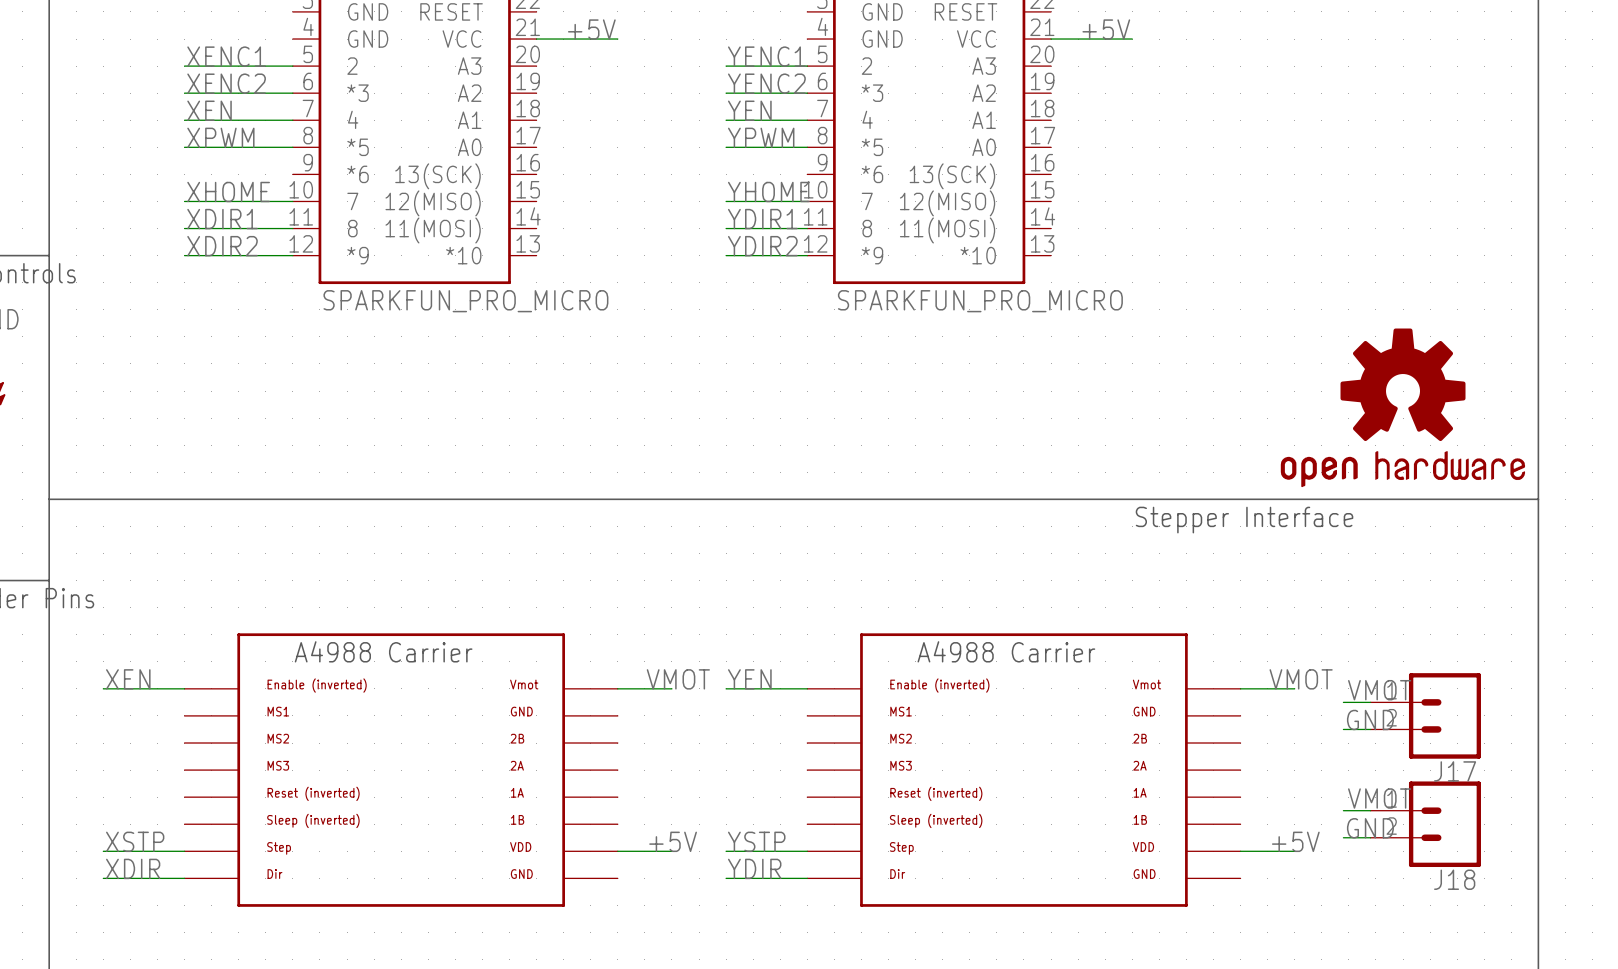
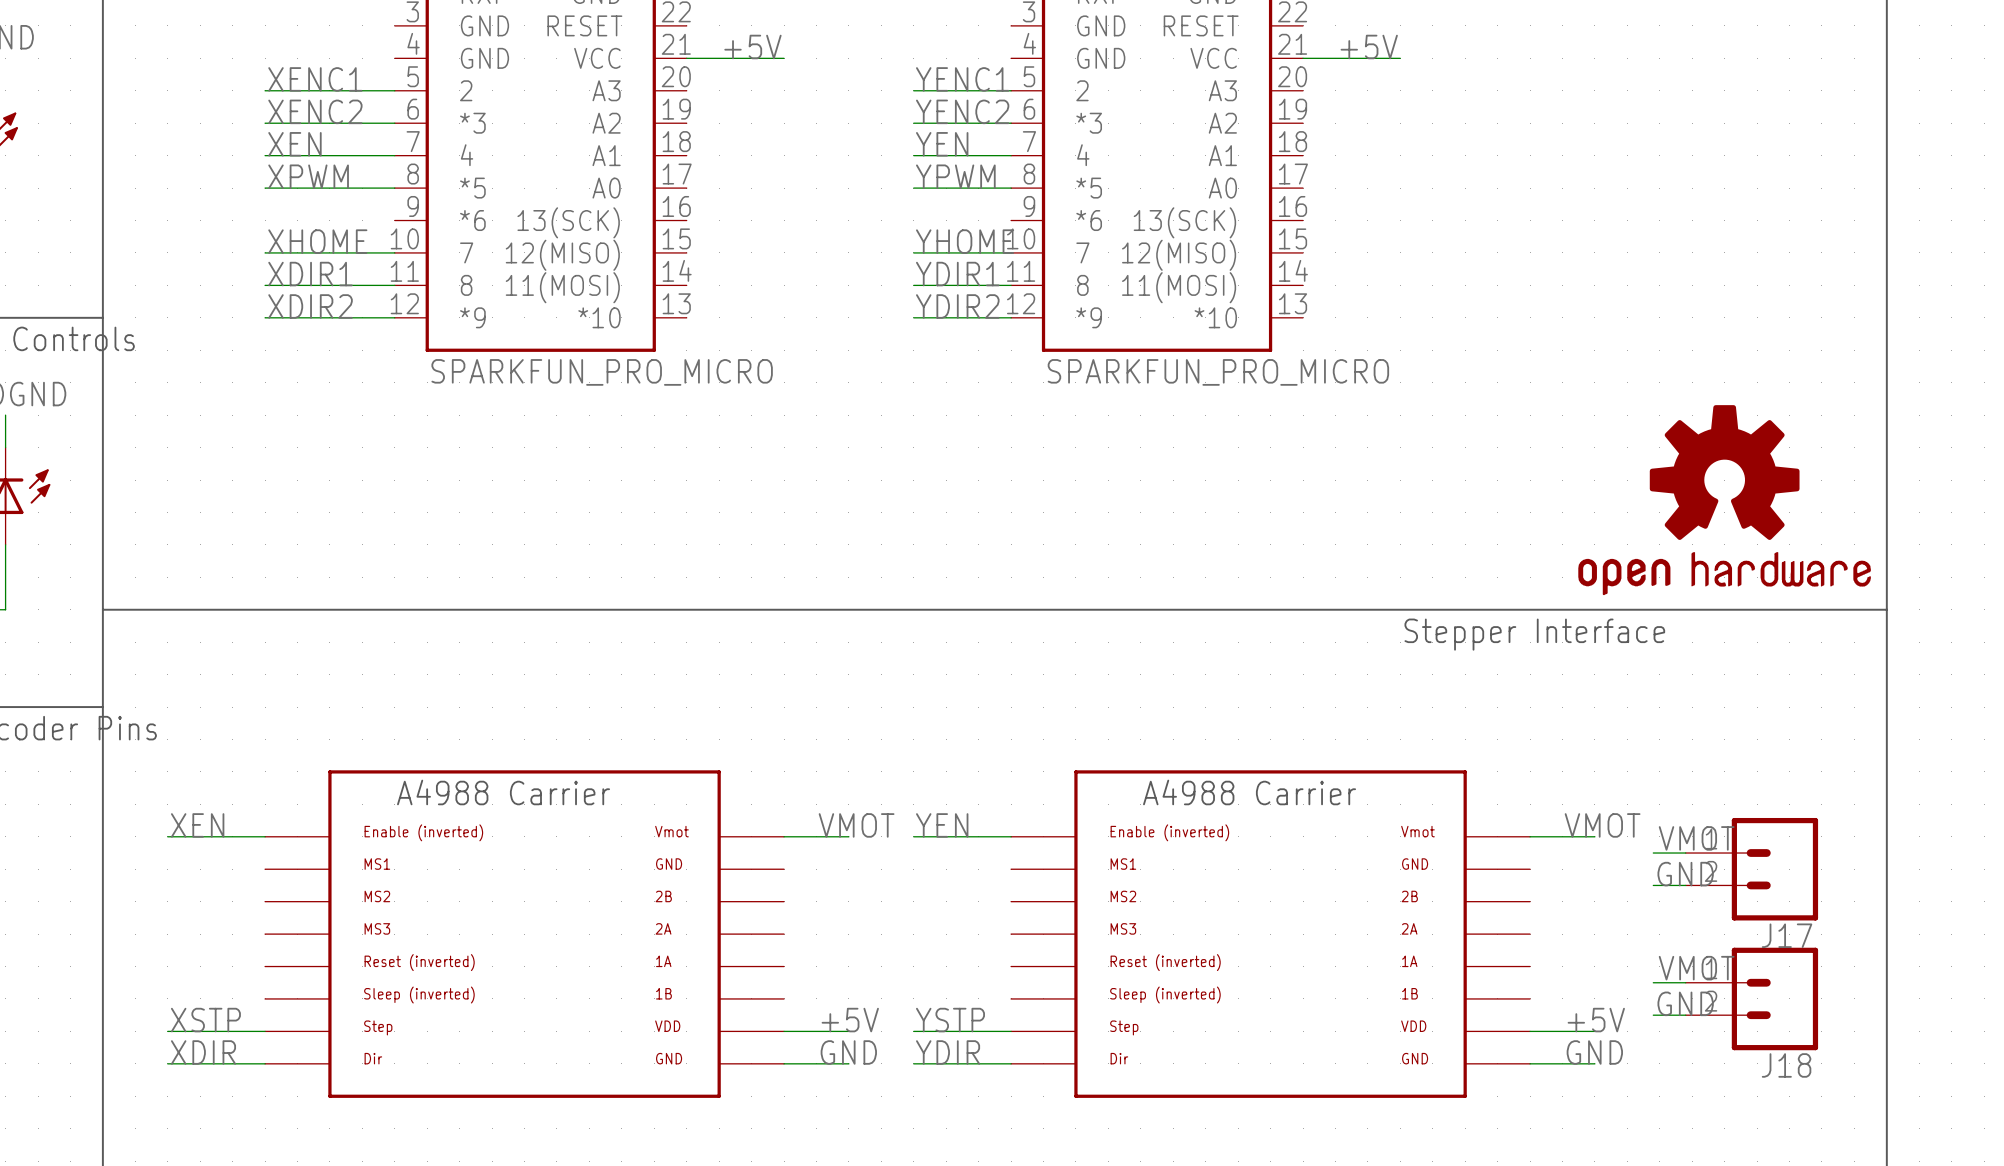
label: none -> GND (848, 1052)
label: none -> GND (1594, 1052)
wire: none -> (784, 1063) (848, 1063)
wire: none -> (1530, 1063) (1594, 1063)

